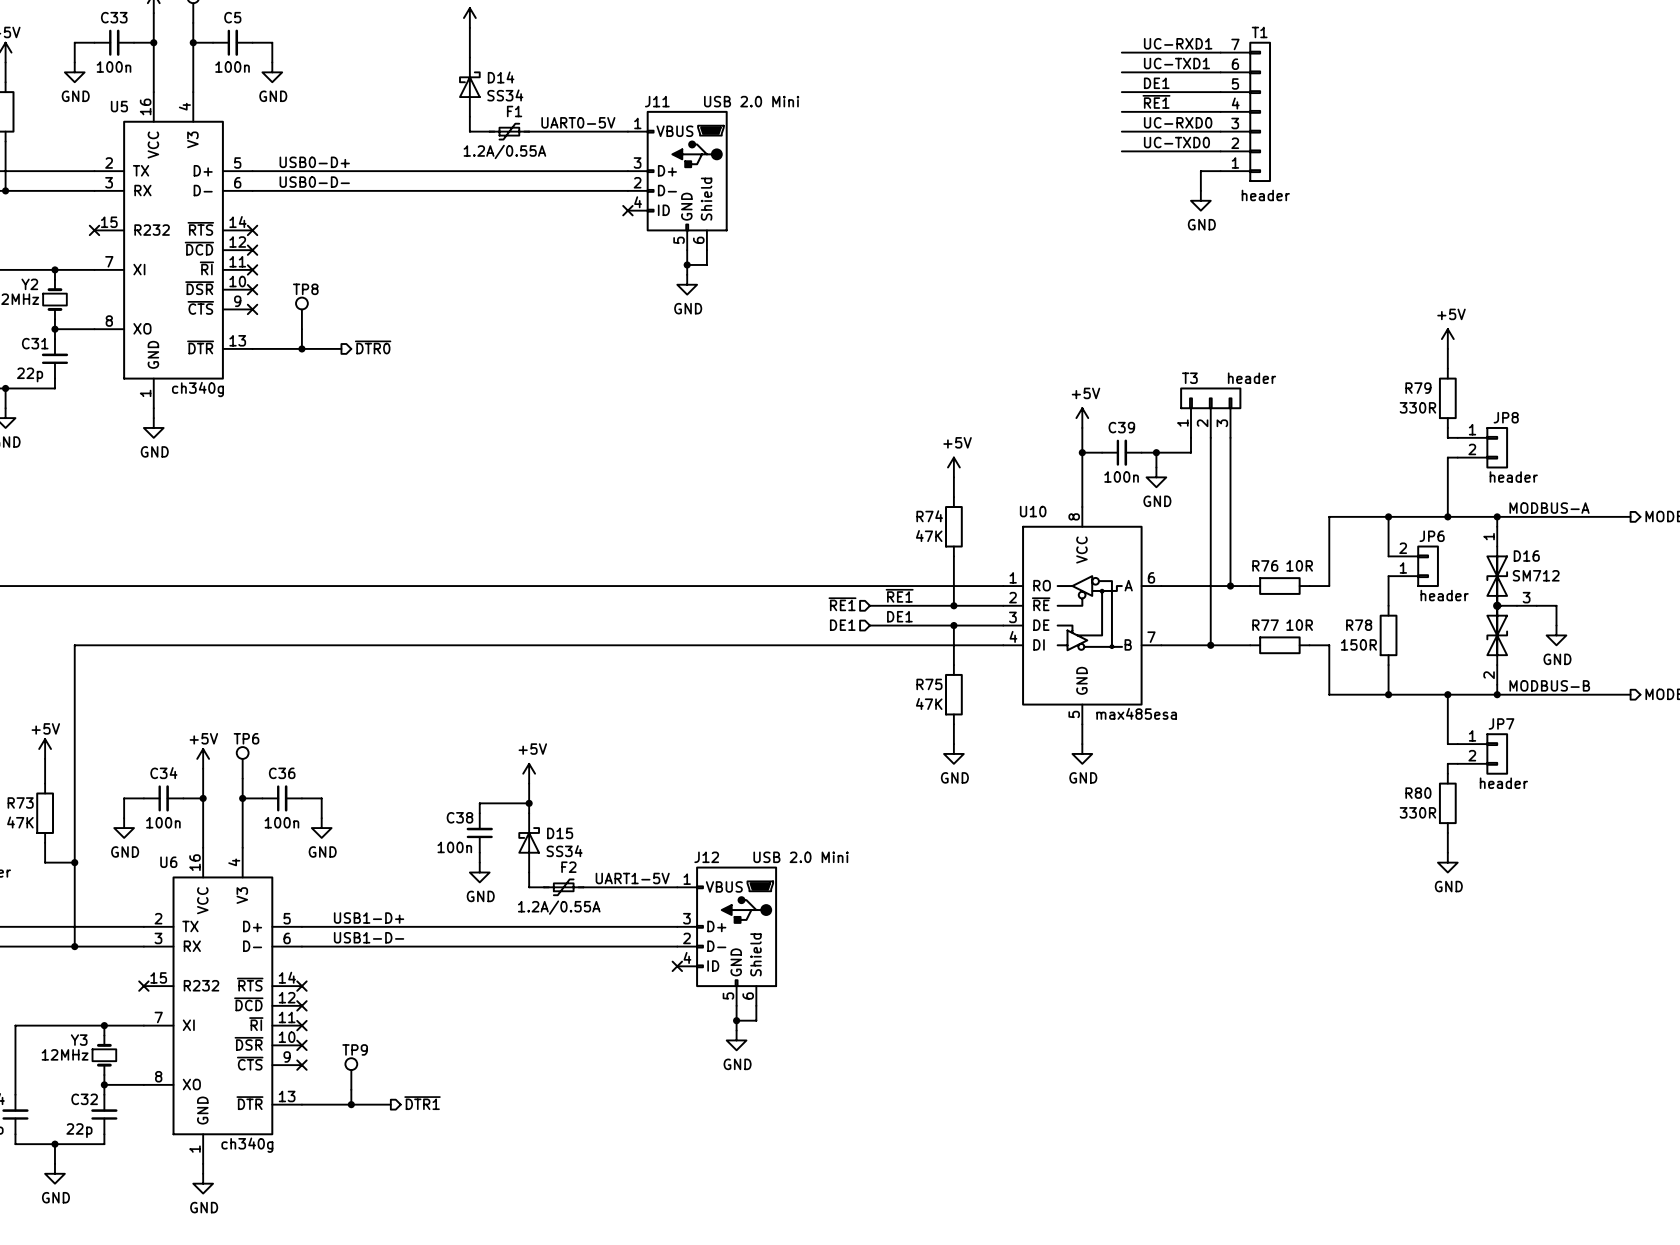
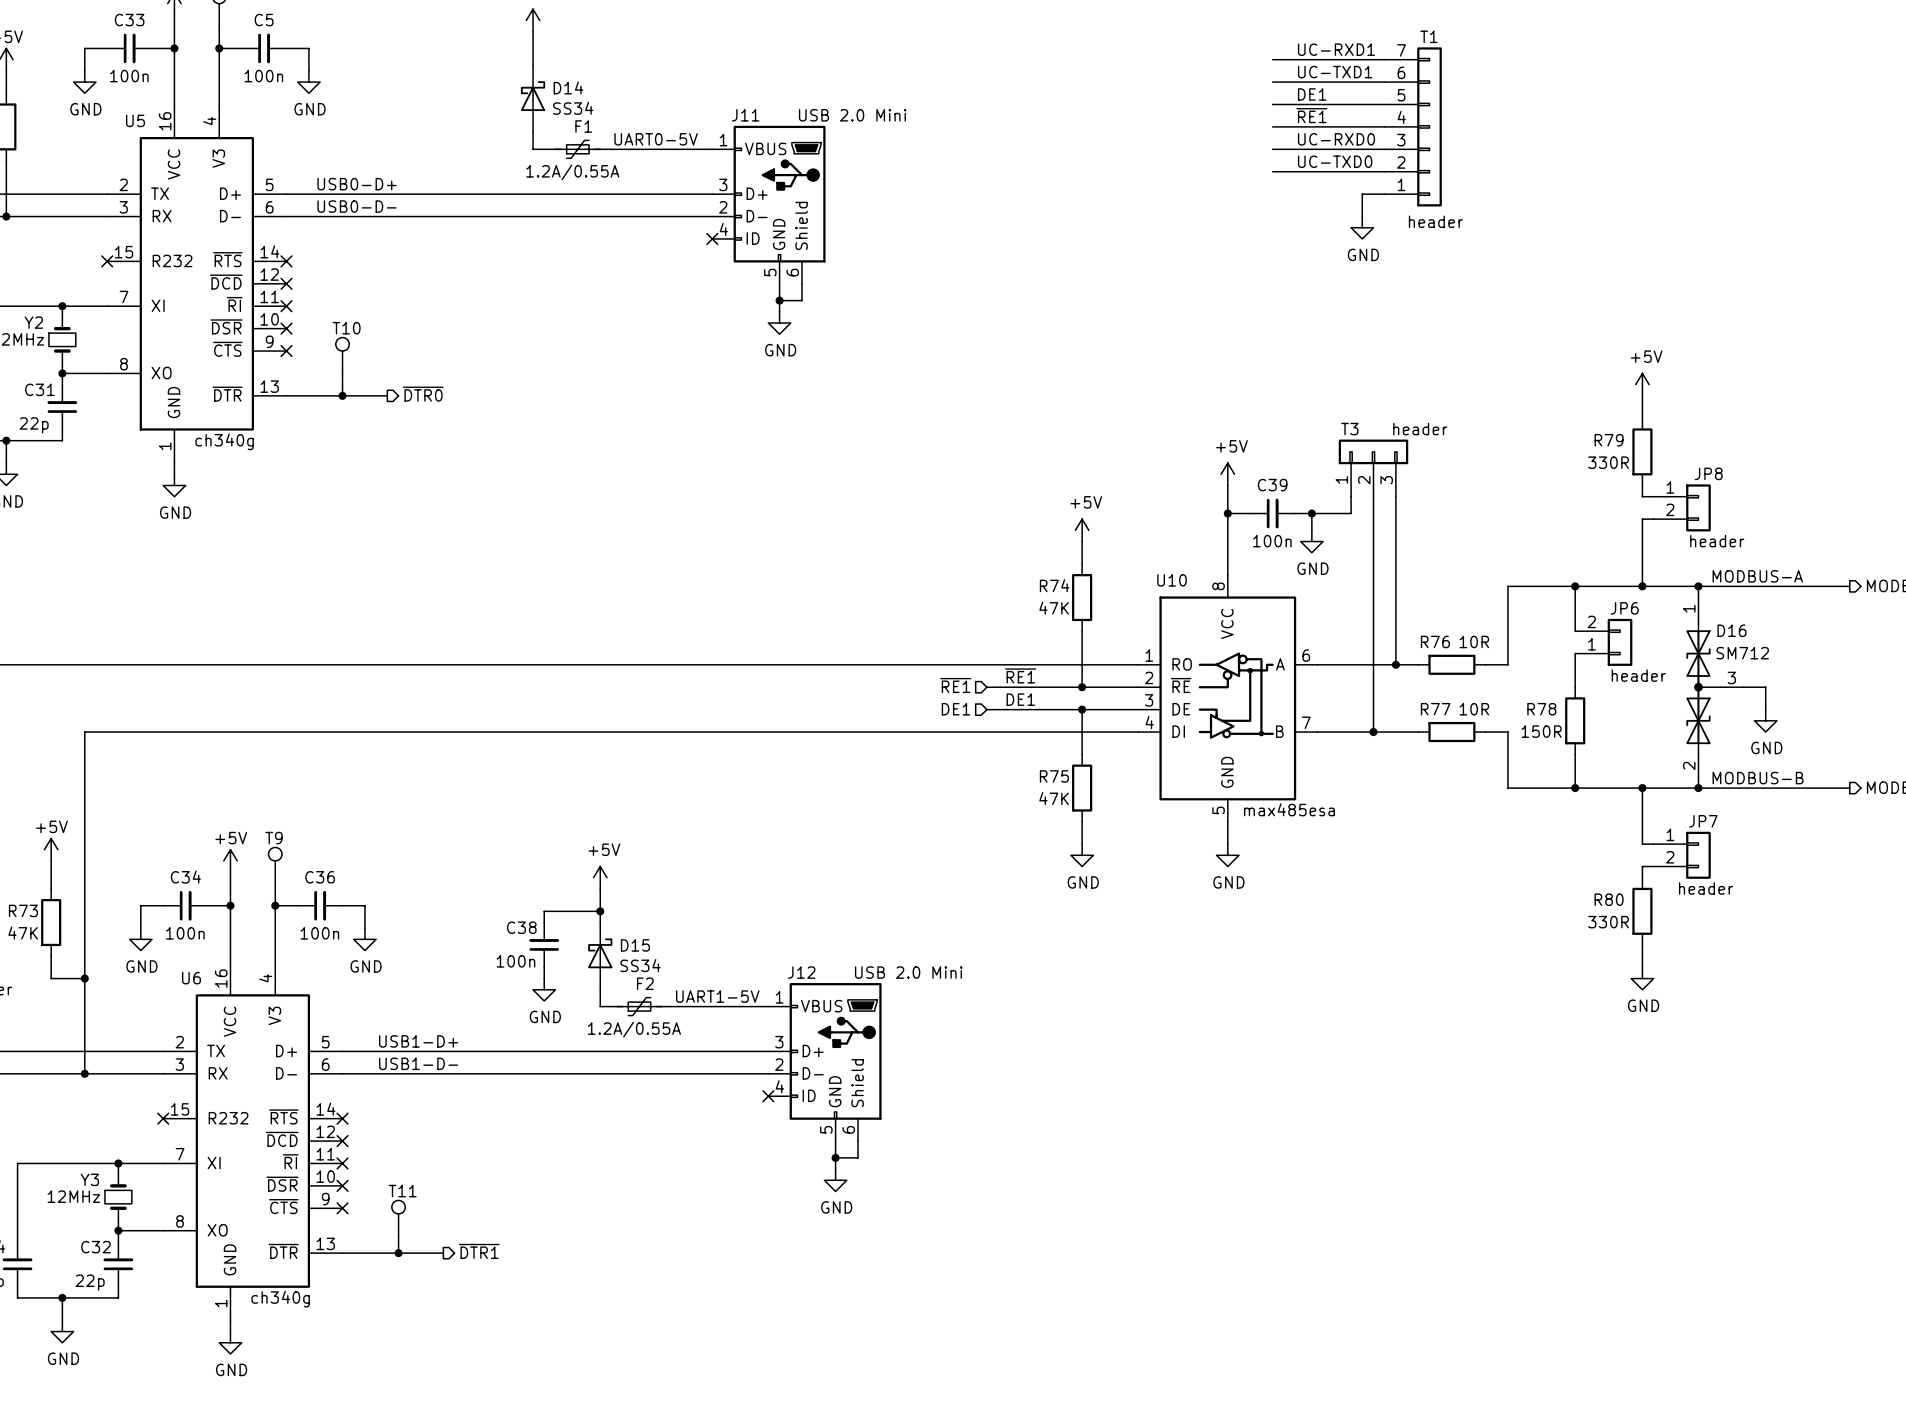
TP8 name: TP8 (305, 289) -> T10 (346, 328)
TP6 name: TP6 (246, 738) -> T9 (274, 838)
TP9 name: TP9 (355, 1049) -> T11 (402, 1191)

